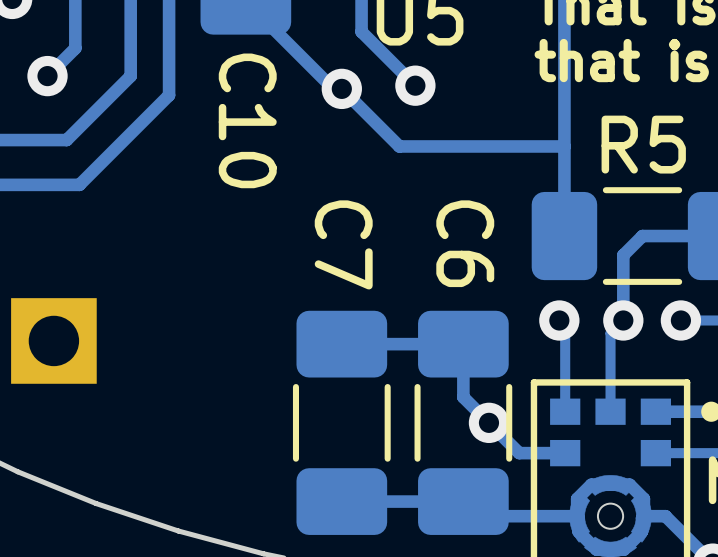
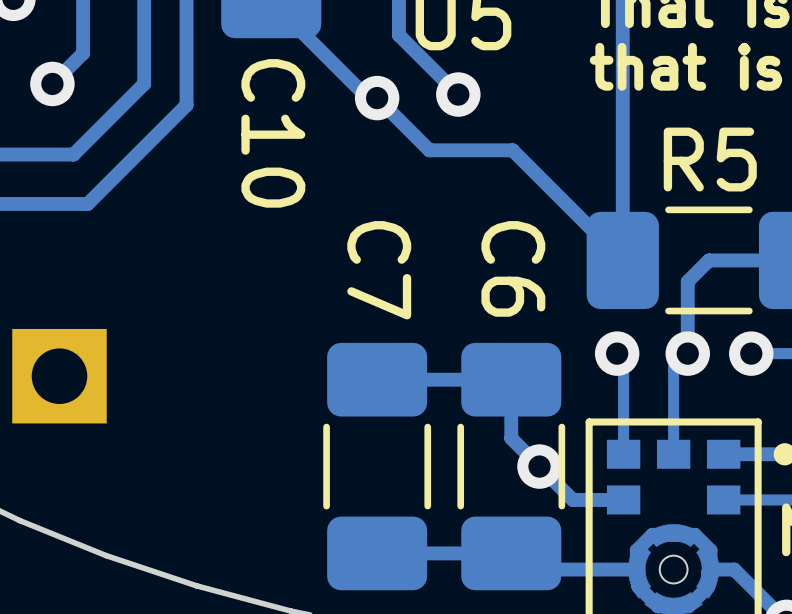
track: (389, 136) (399, 146) (564, 146) -> (429, 150) (512, 150) (622, 260)

